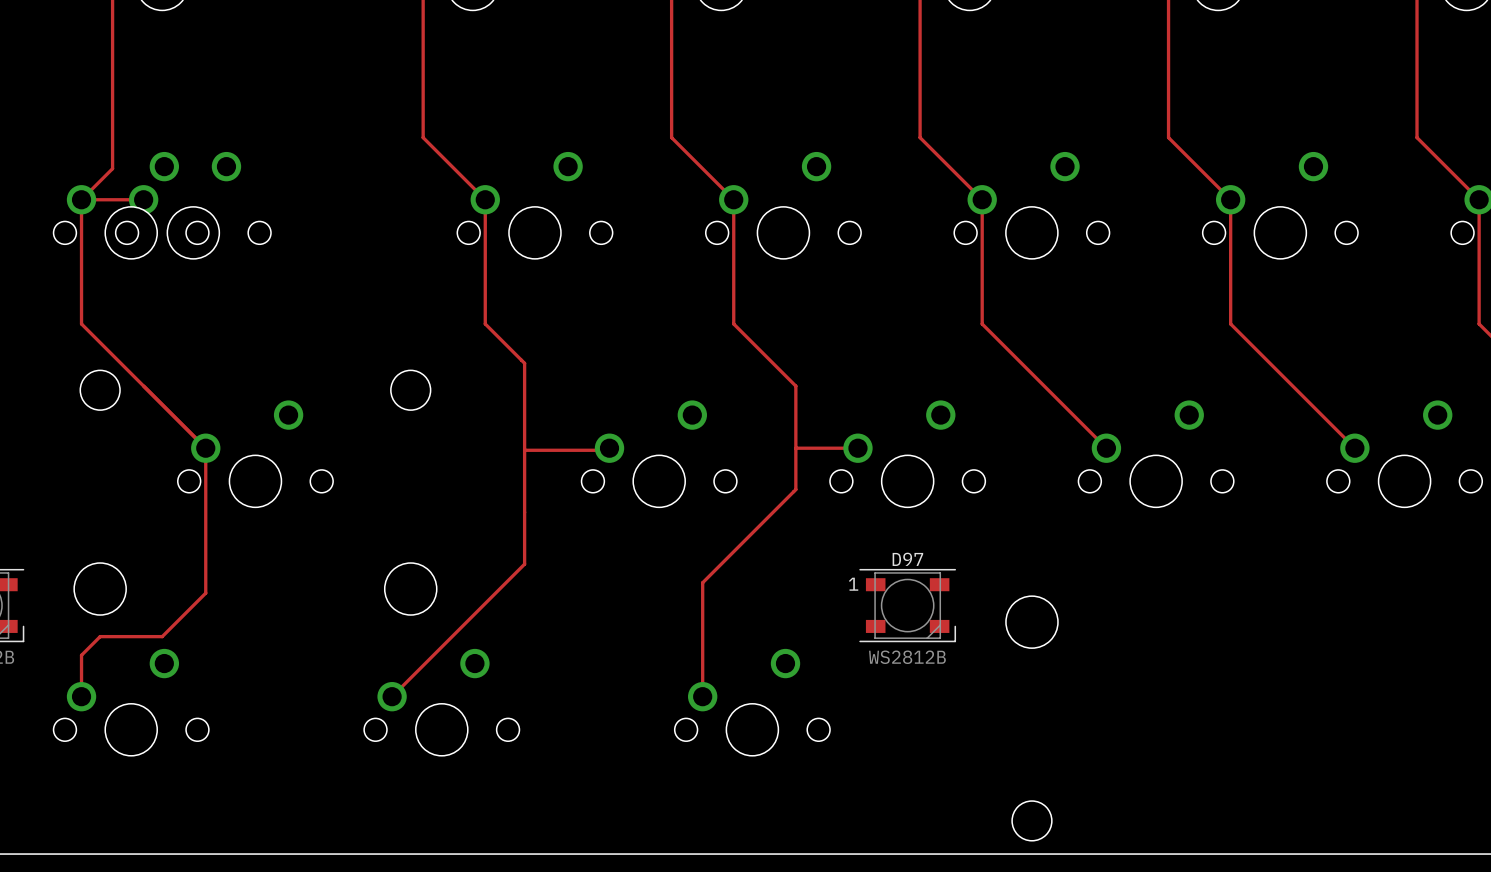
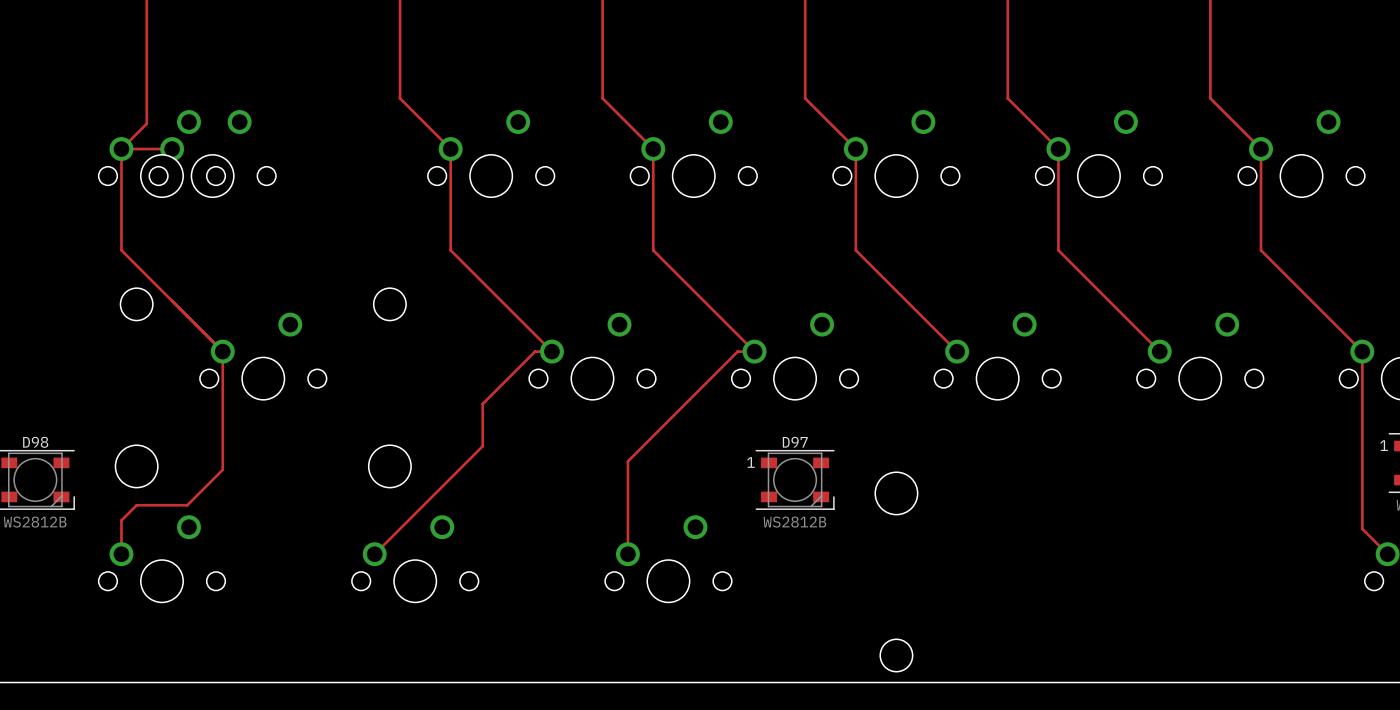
track: (524, 363) (524, 512) -> (482, 282) (551, 351) (535, 351) (482, 403)
track: (795, 386) (795, 489) -> (703, 300) (754, 351)
track: (609, 448) (607, 450) (524, 450) -> none
track: (795, 448) (837, 448) -> (703, 385) (737, 351)

